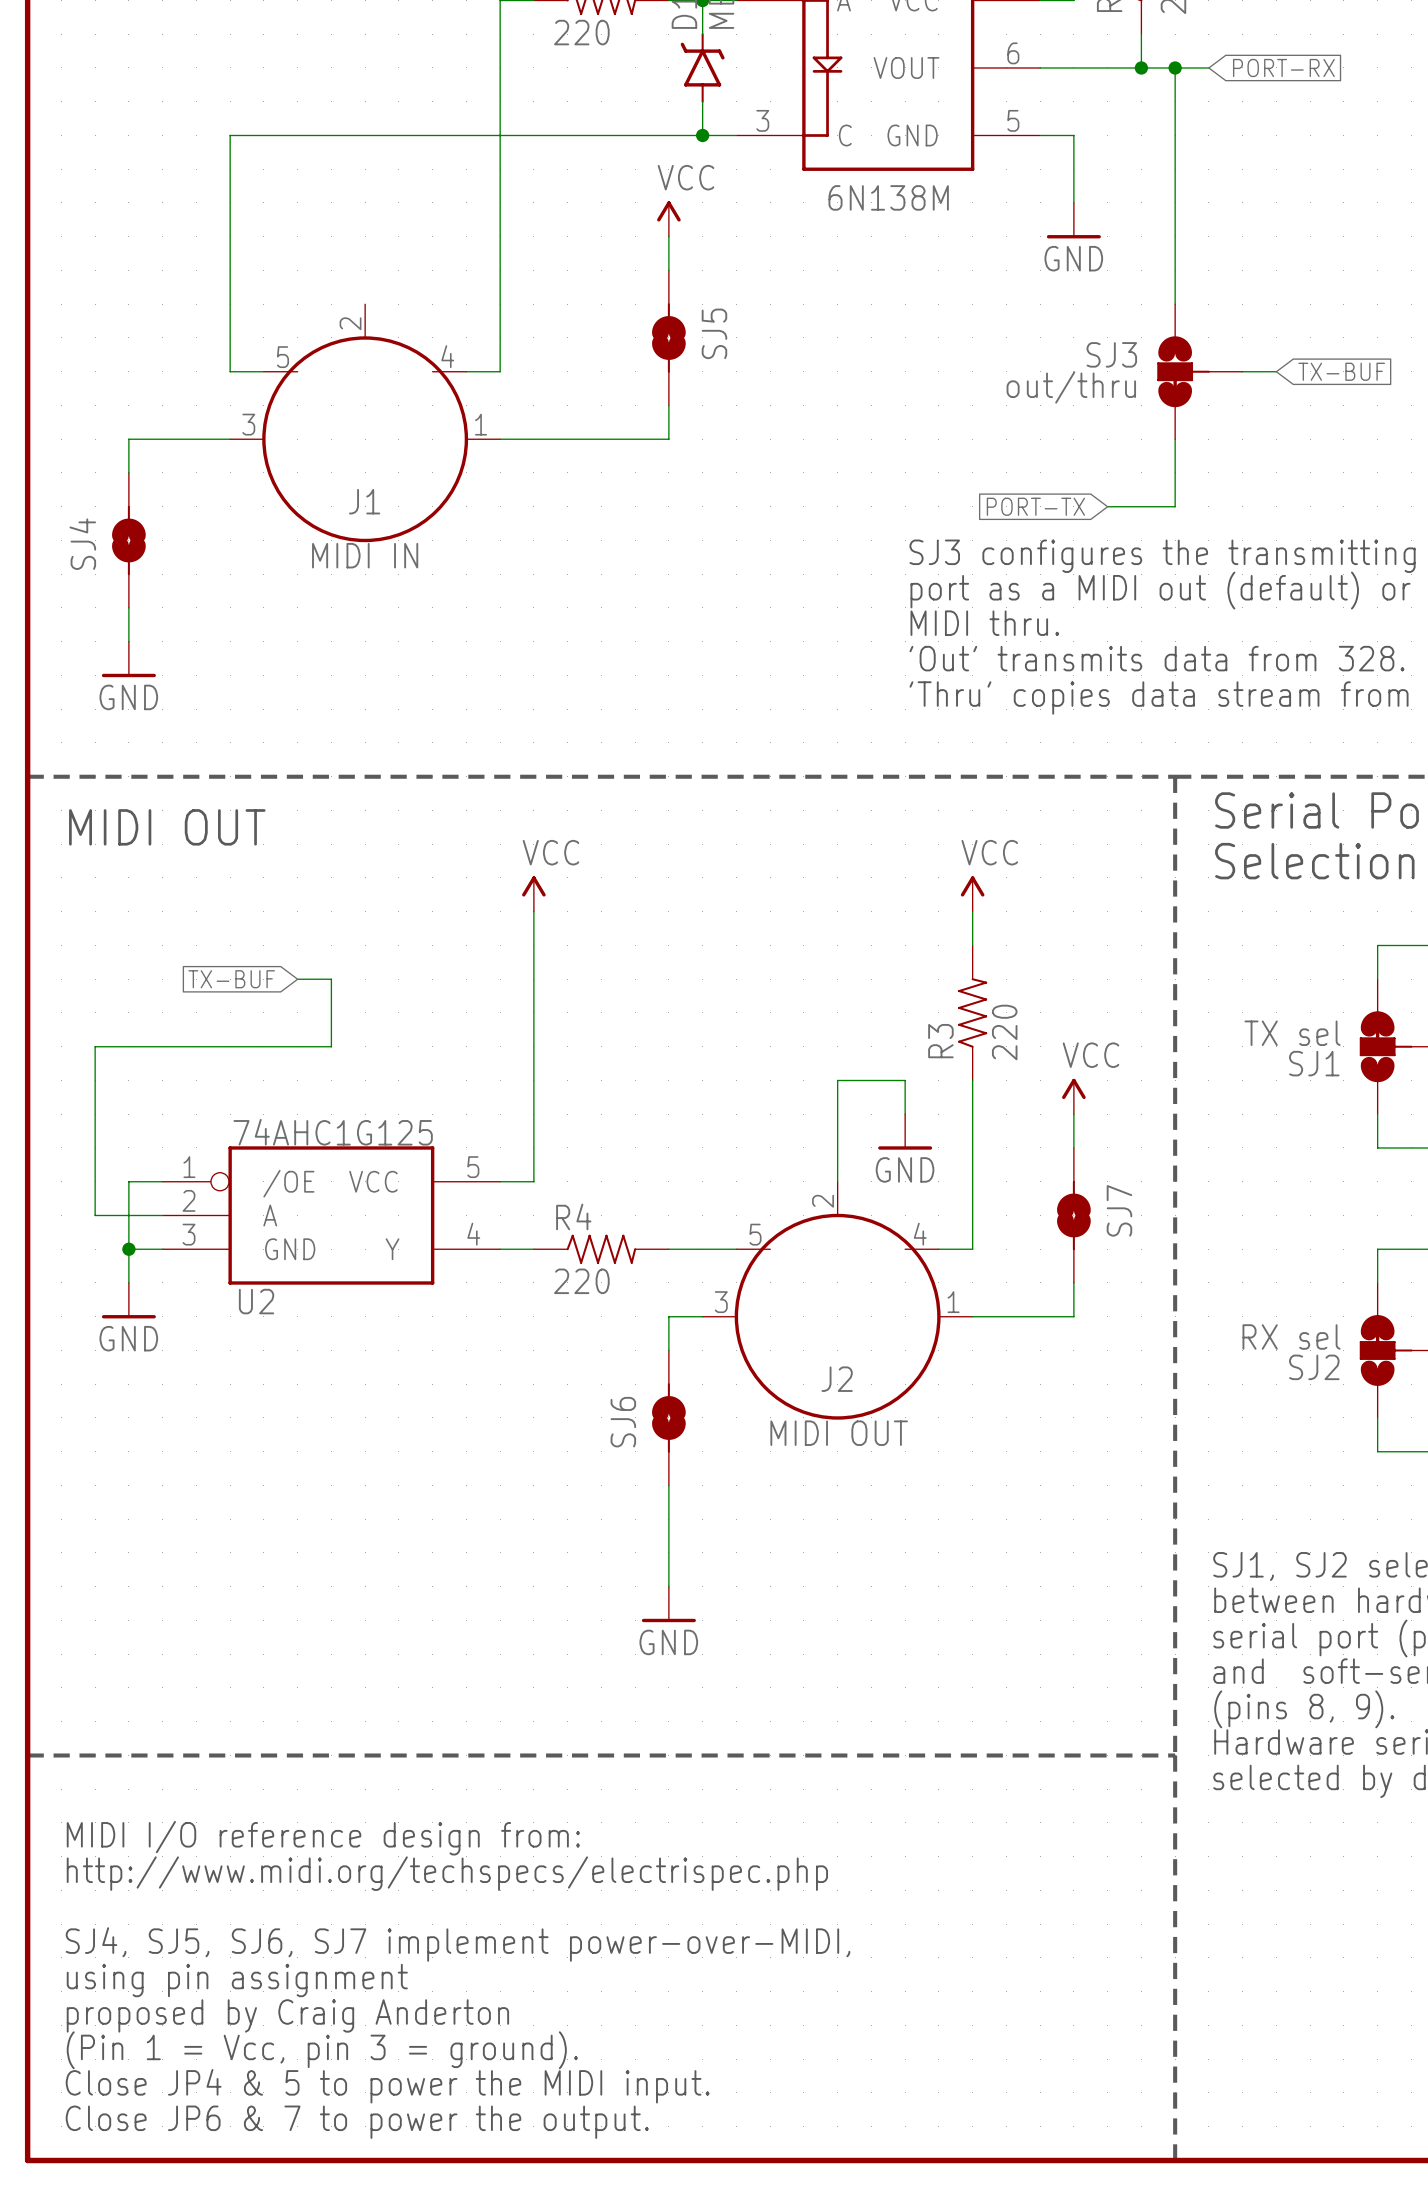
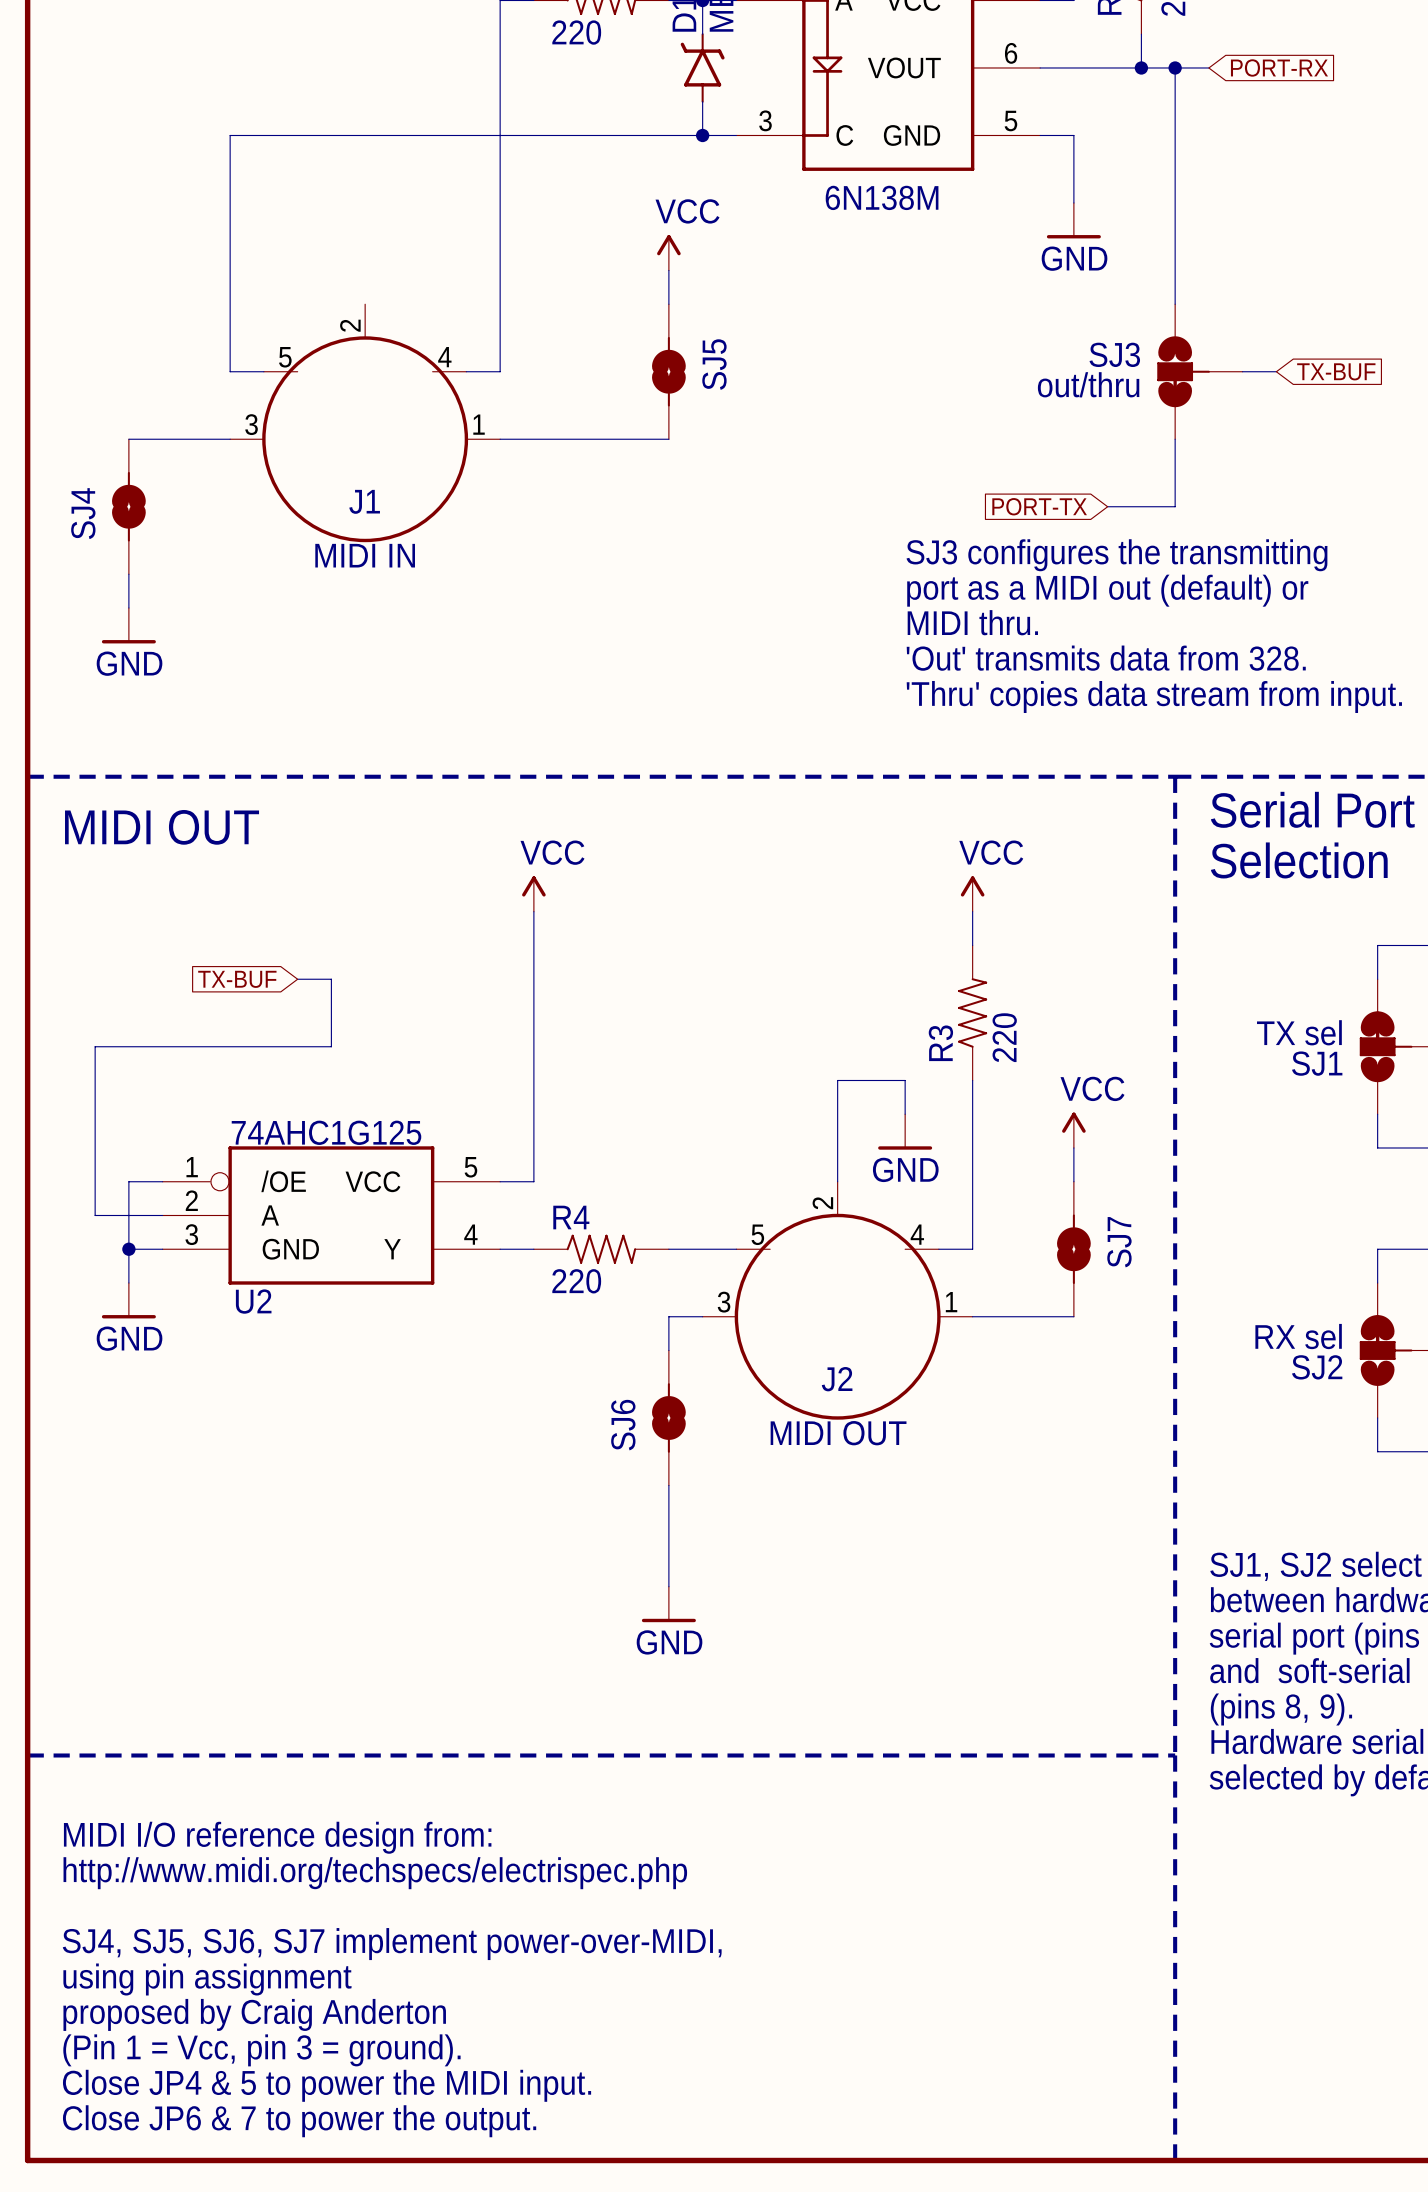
power symbol position: VCC (668, 219) -> VCC (668, 252)
SJ5 position: (668, 337) -> (668, 371)
SJ4 position: (128, 540) -> (128, 506)
power symbol position: GND (128, 659) -> GND (128, 625)
power symbol position: VCC (1073, 1096) -> VCC (1073, 1130)
SJ7 position: (1073, 1215) -> (1073, 1249)

